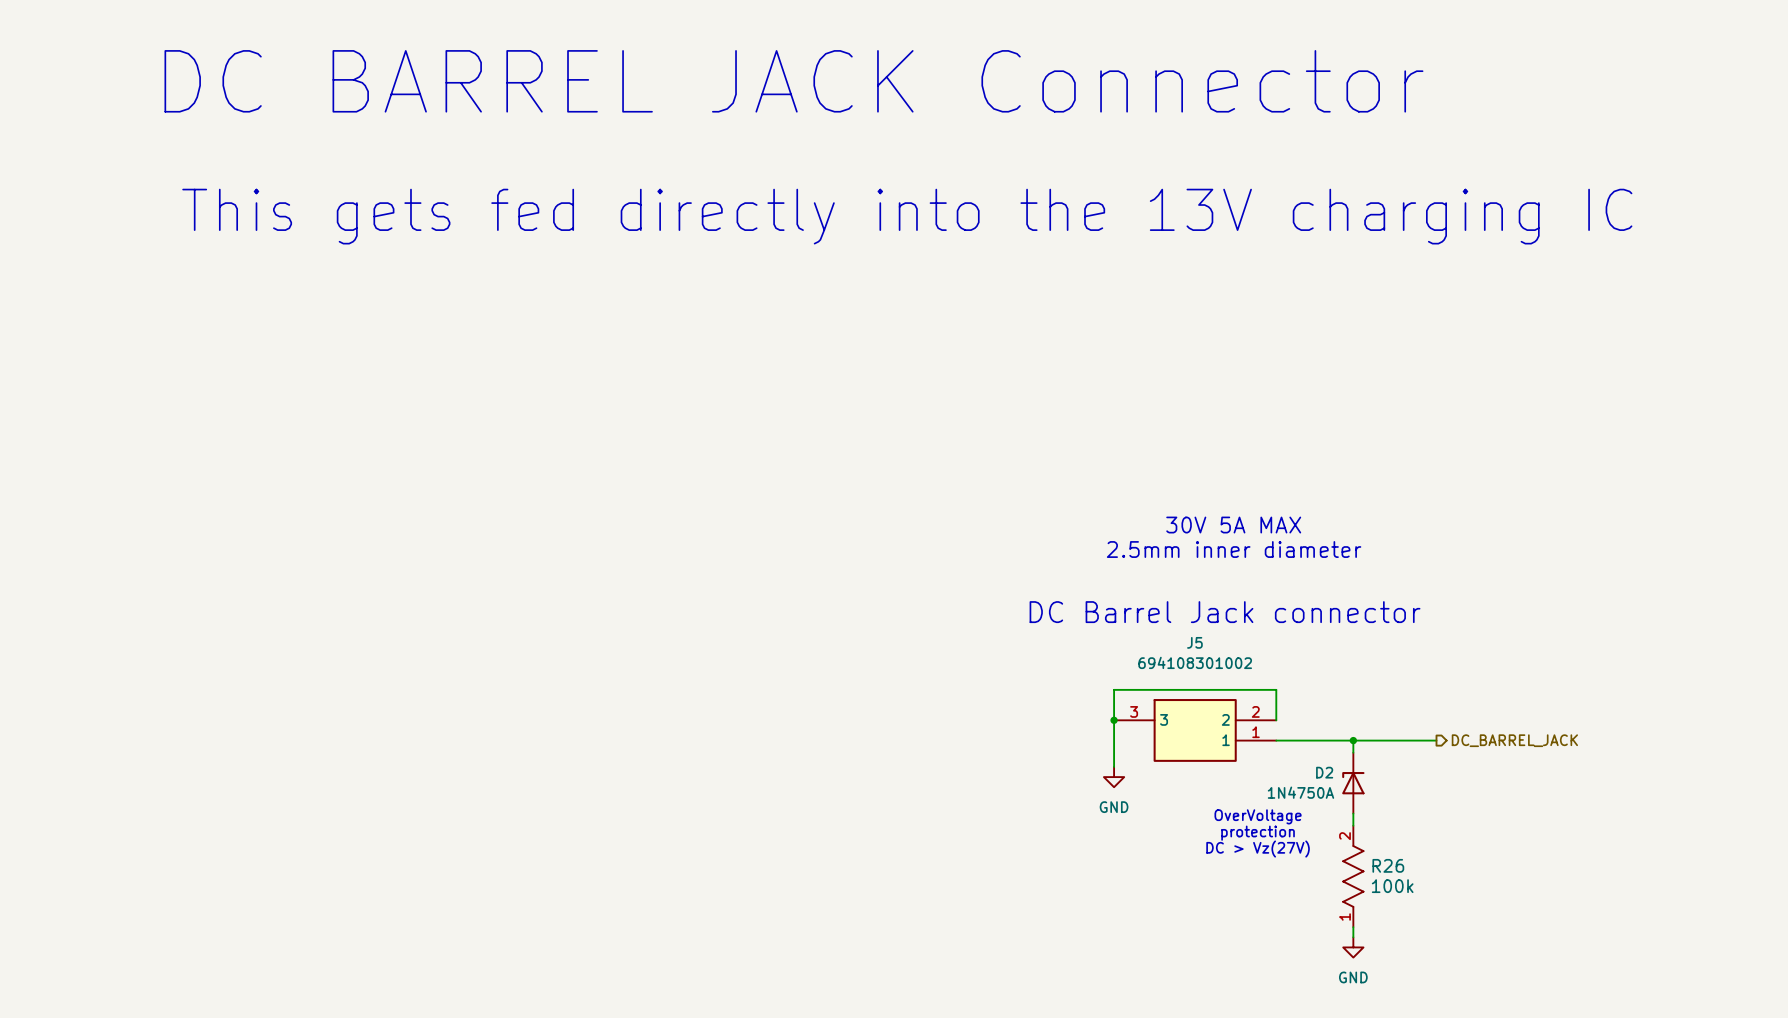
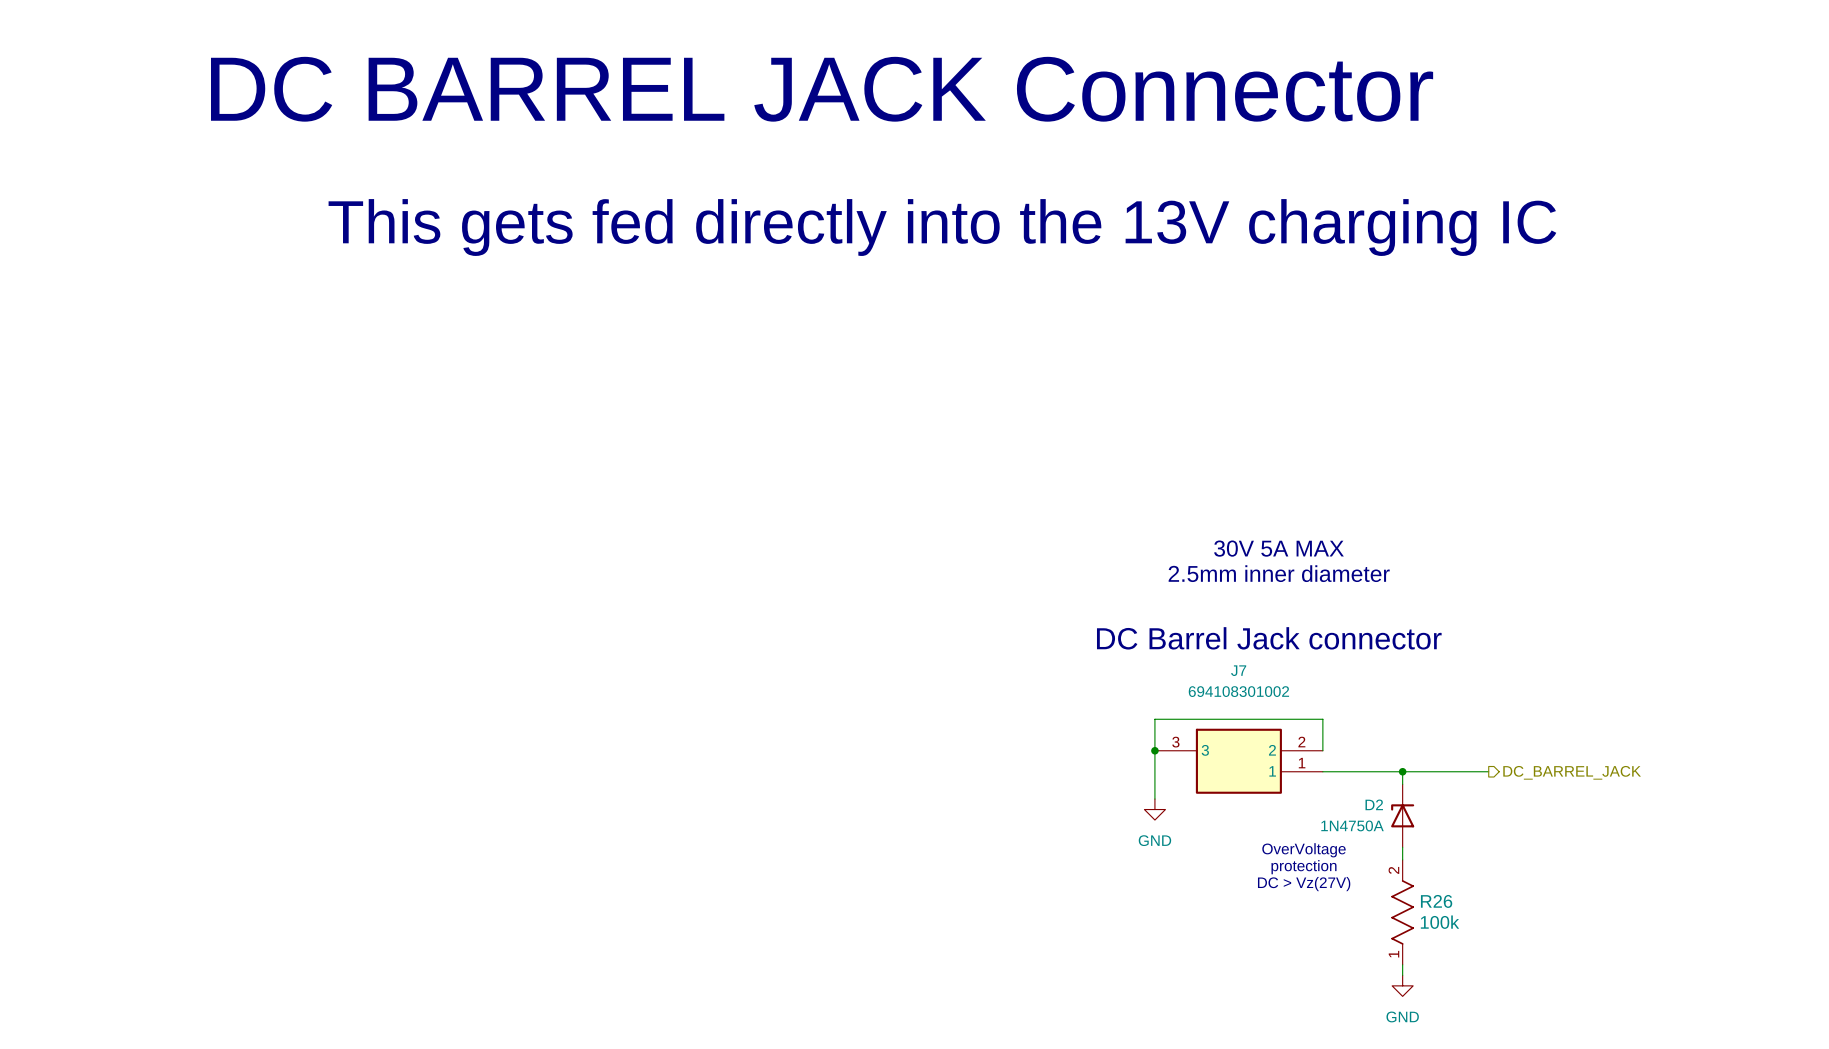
J5 name: J5 (1194, 642) -> J7 (1238, 670)

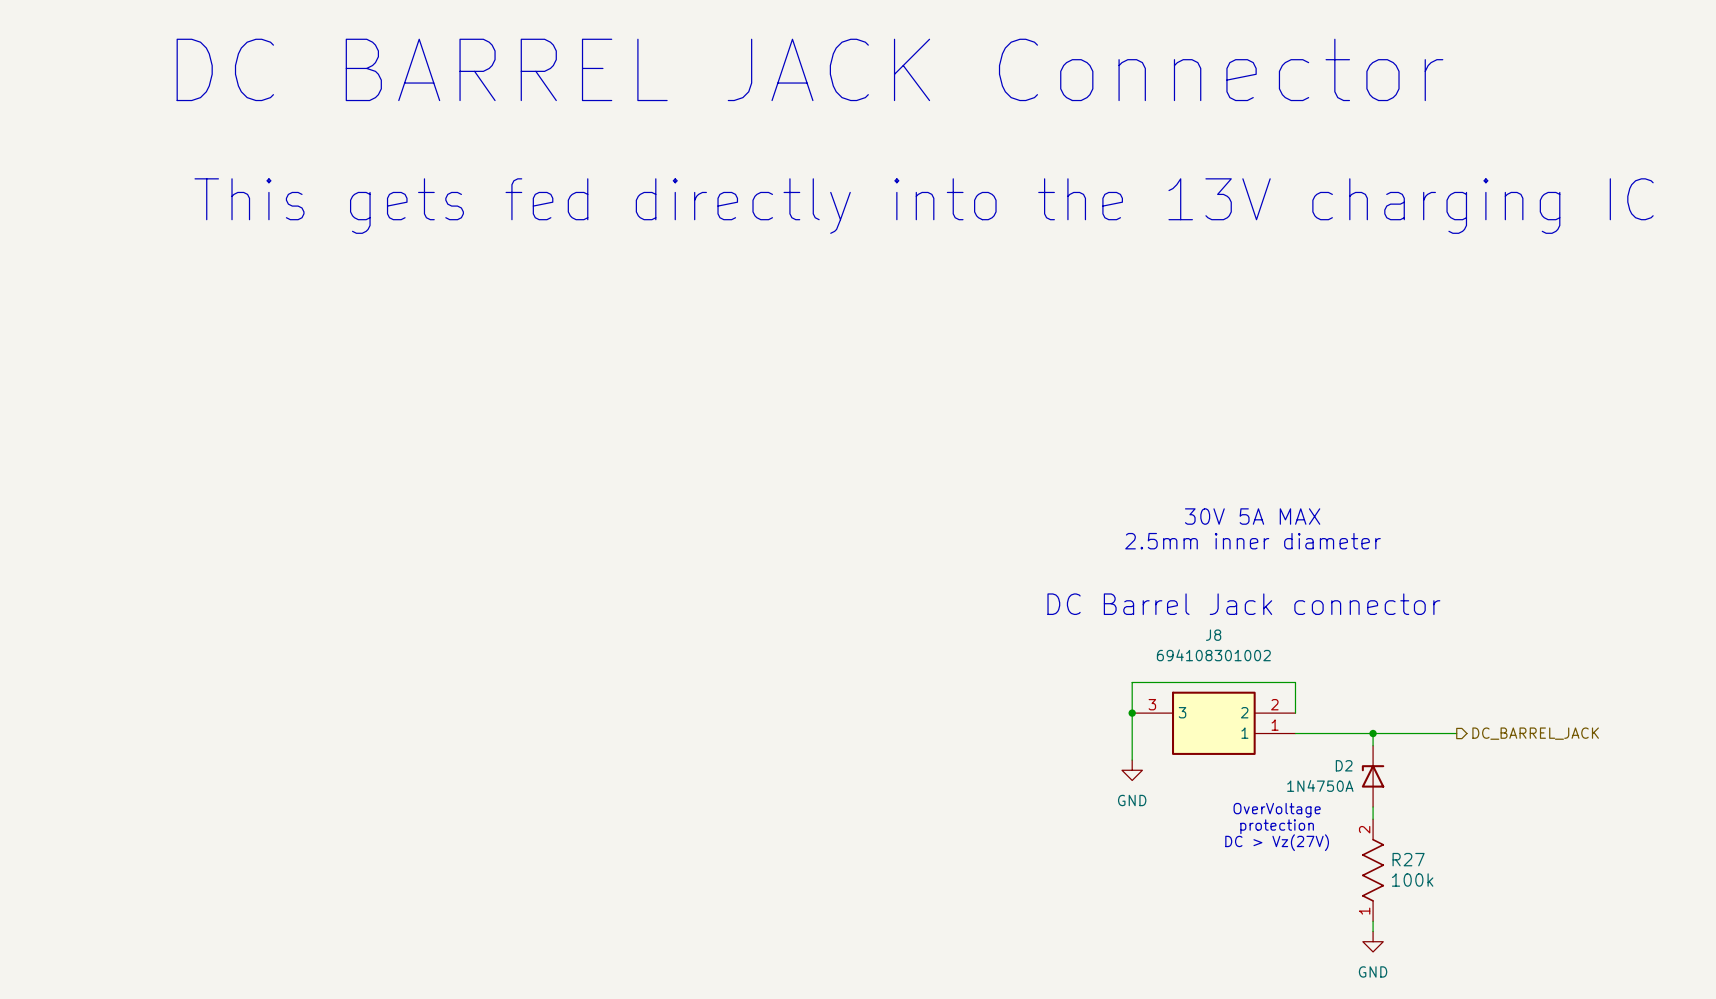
J7 name: J7 (1238, 670) -> J8 (1213, 635)
R26 name: R26 (1436, 901) -> R27 (1408, 859)

